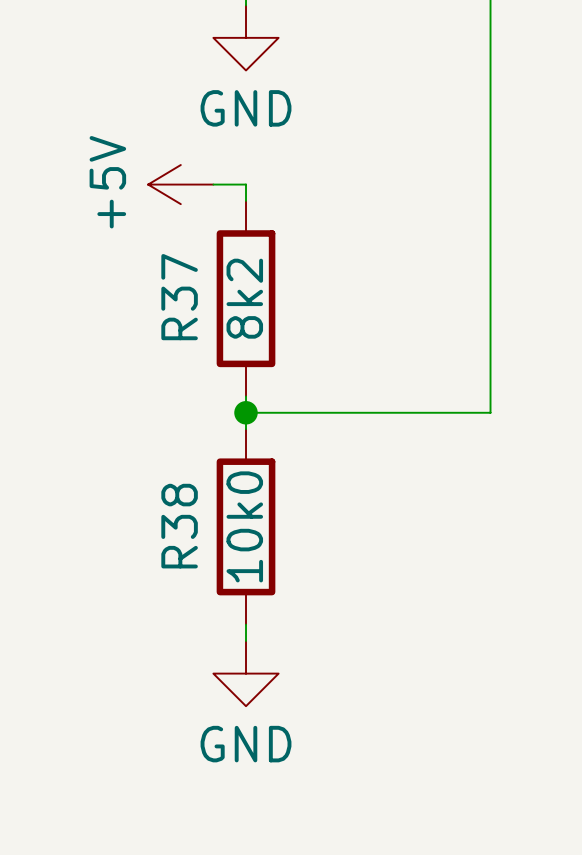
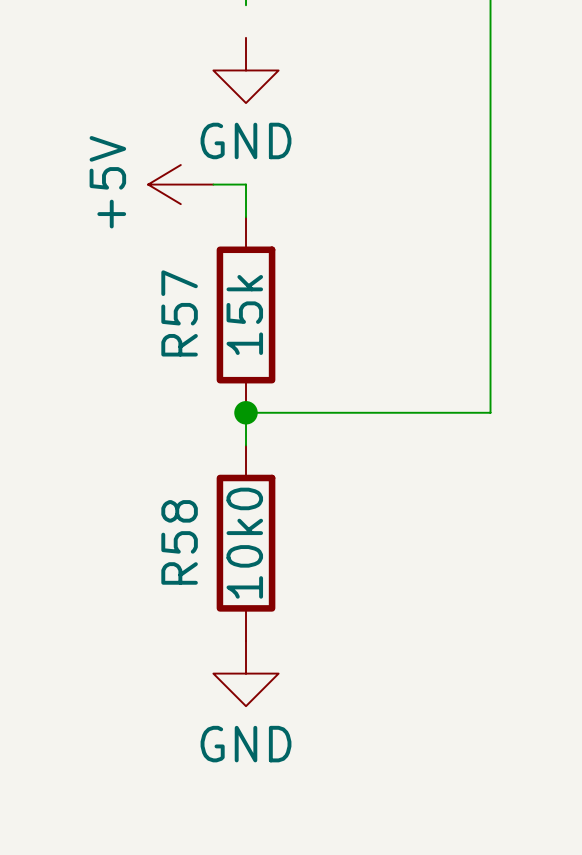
power symbol position: GND (246, 37) -> GND (246, 70)
R37 name: R37 (179, 297) -> R57 (179, 313)
R37 value: 8k2 (244, 298) -> 15k (244, 314)
R37 position: (246, 298) -> (246, 314)
R38 name: R38 (179, 526) -> R58 (179, 542)
R38 position: (246, 526) -> (246, 543)

